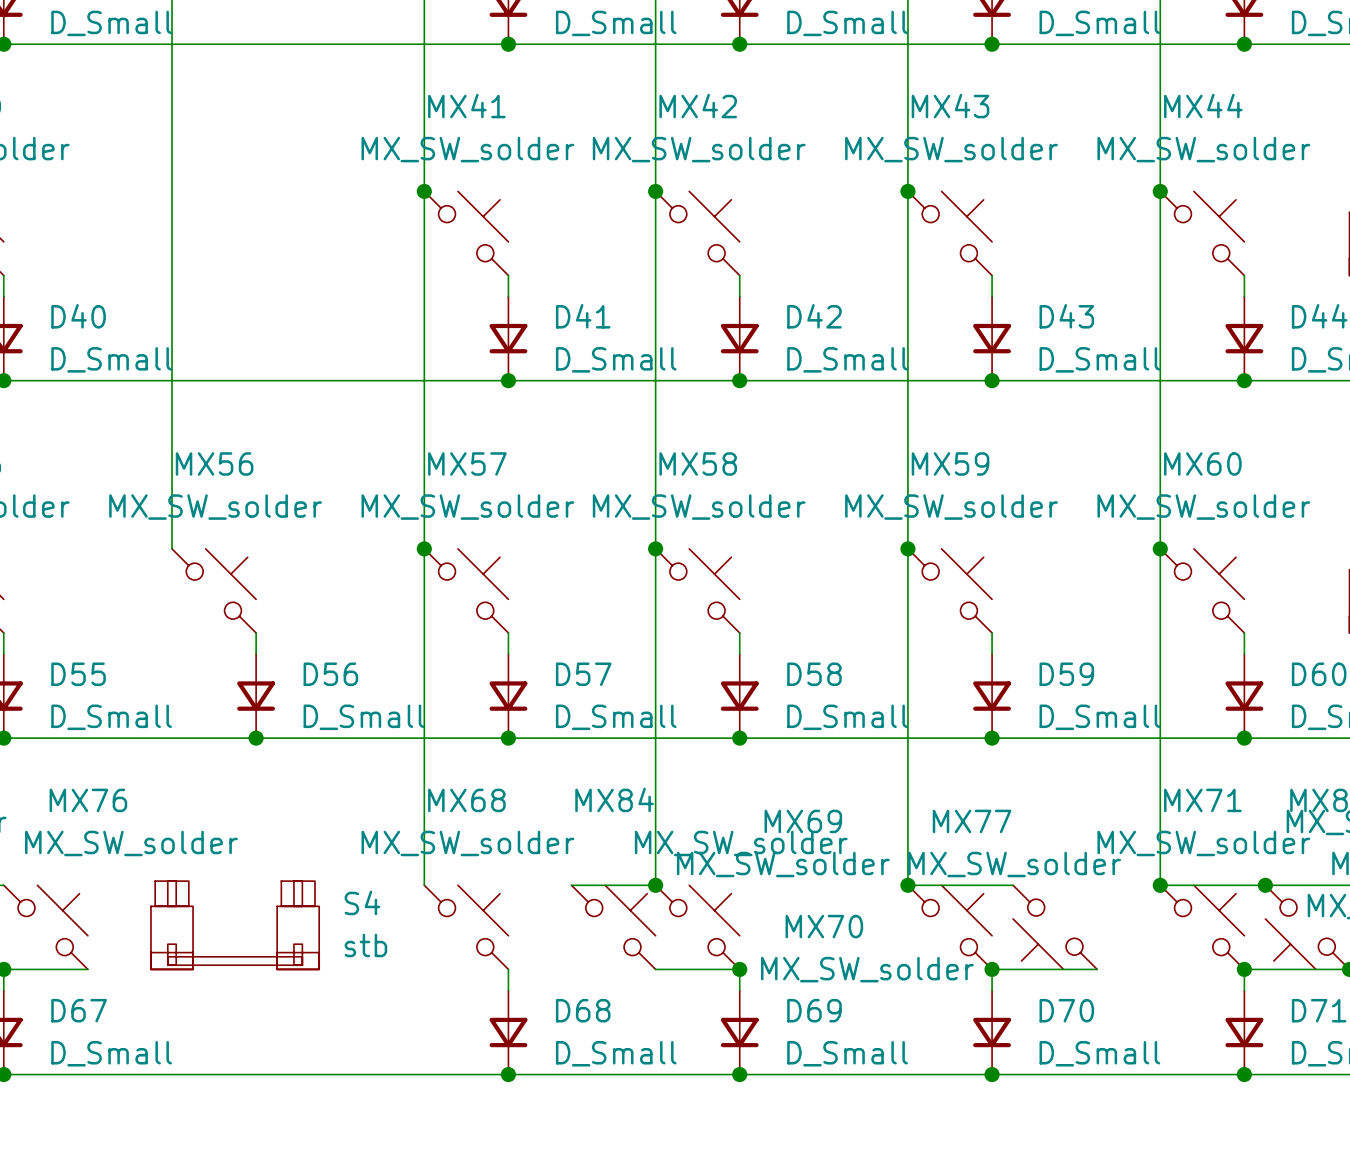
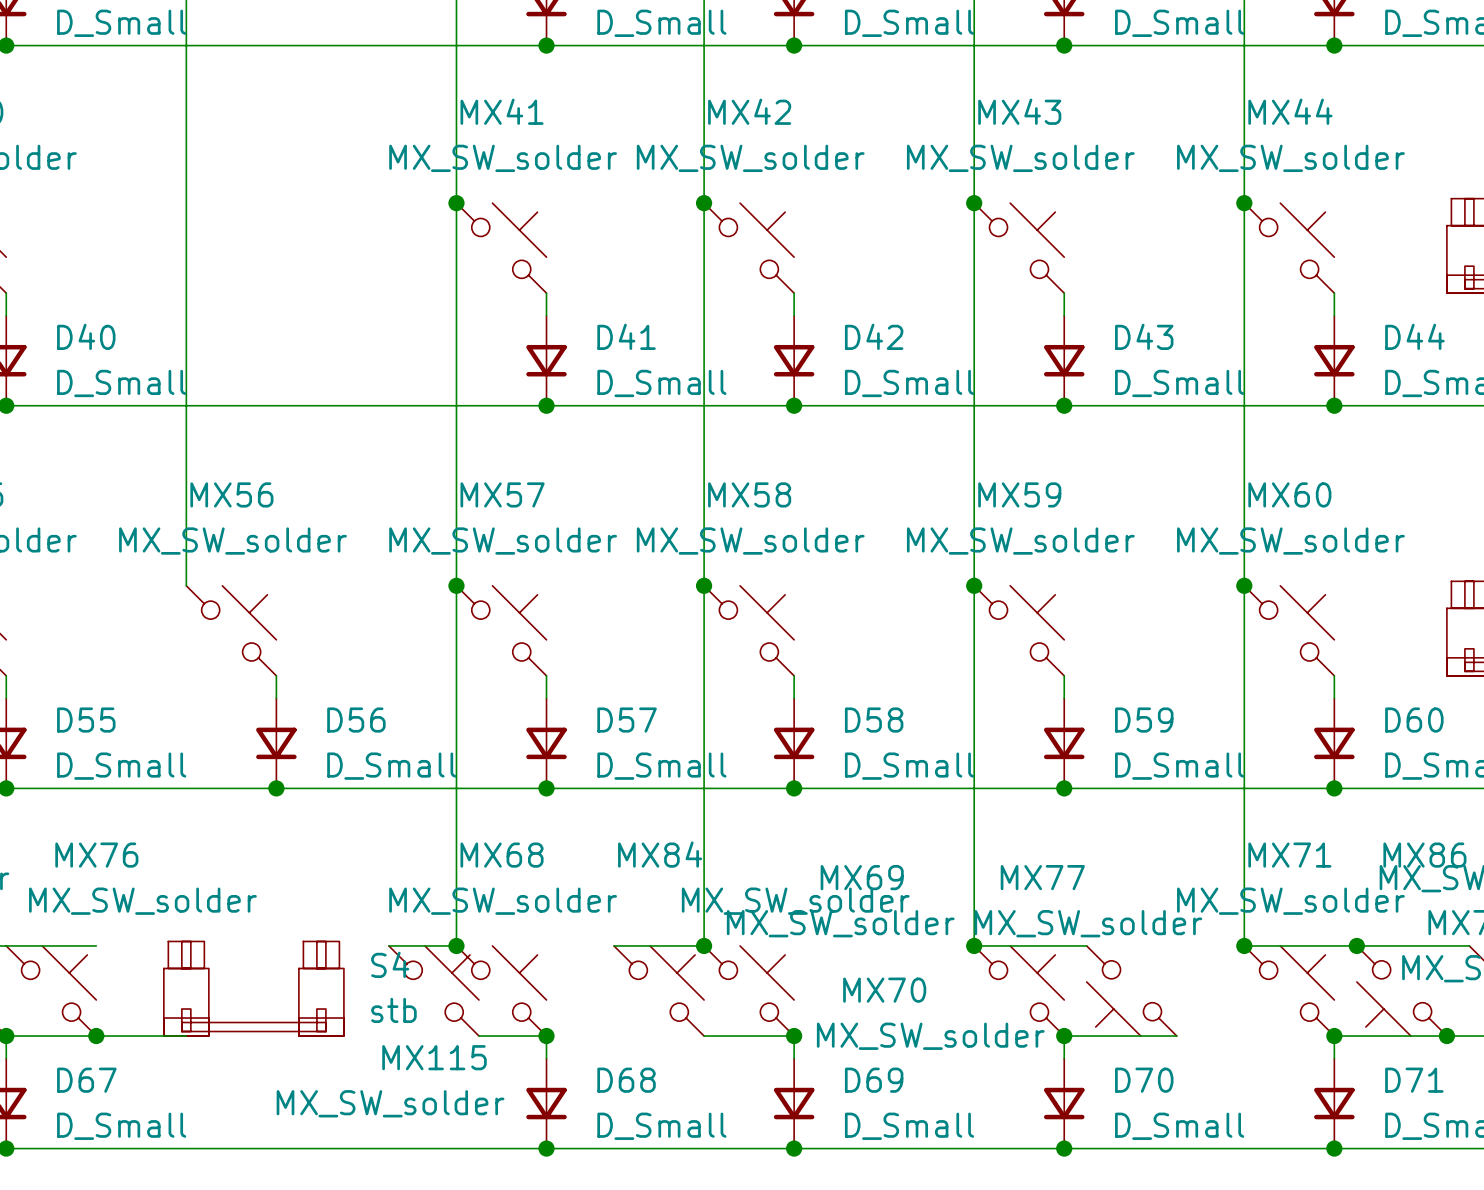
wire: none -> (6, 945) (96, 945)
wire: none -> (388, 945) (456, 945)
junction: none -> (456, 945)
MX115: none -> MX_SW_solder (433, 990)
wire: none -> (96, 1036) (186, 1036)
junction: none -> (96, 1036)
wire: none -> (478, 1036) (546, 1036)
junction: none -> (546, 1036)

